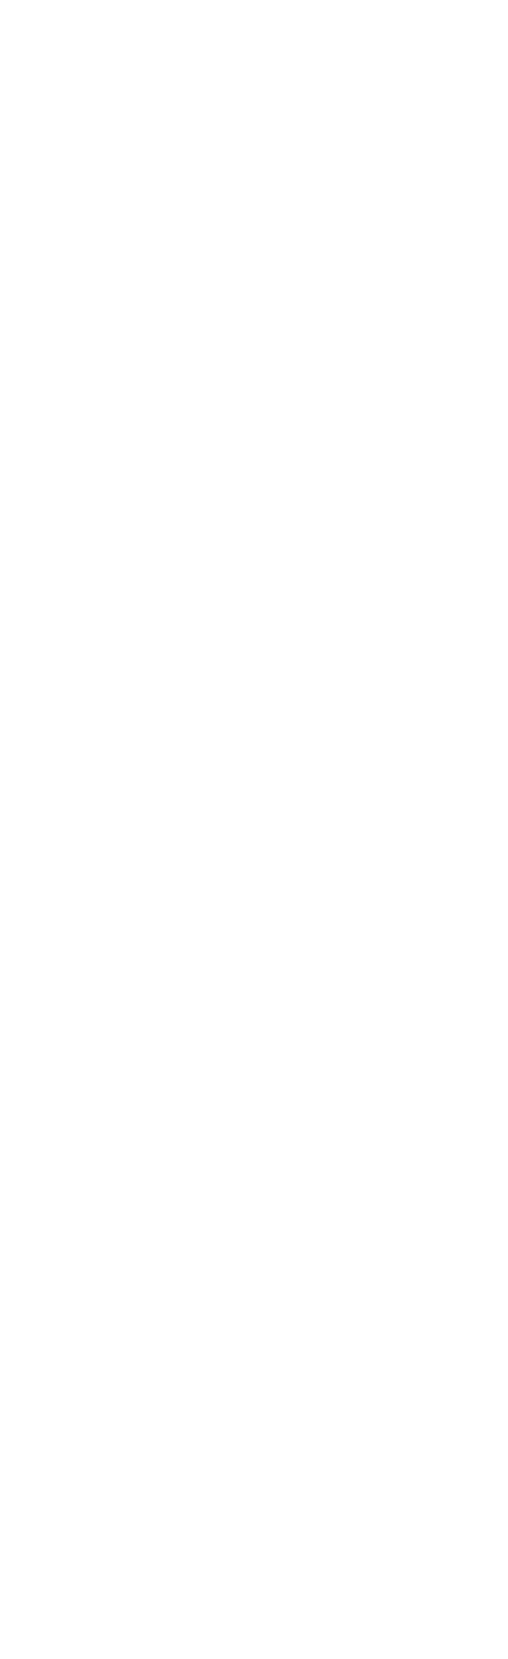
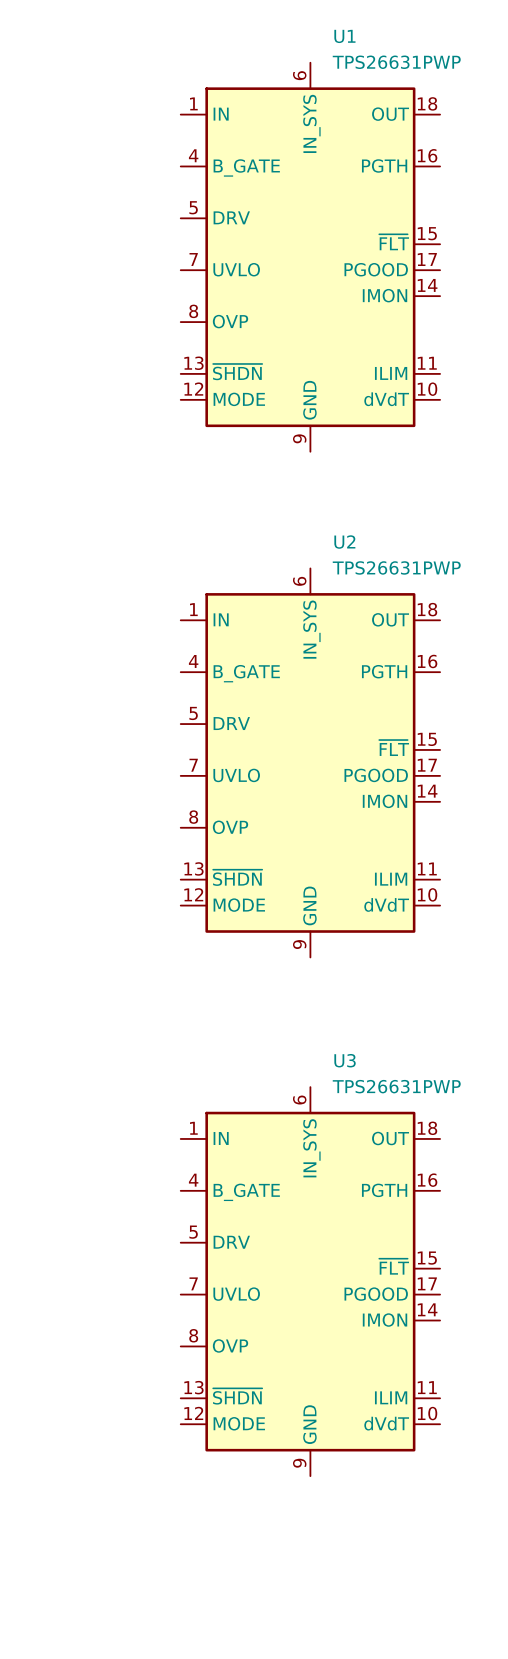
U1: none -> TPS26631PWP (310, 257)
U2: none -> TPS26631PWP (310, 762)
U3: none -> TPS26631PWP (310, 1281)

